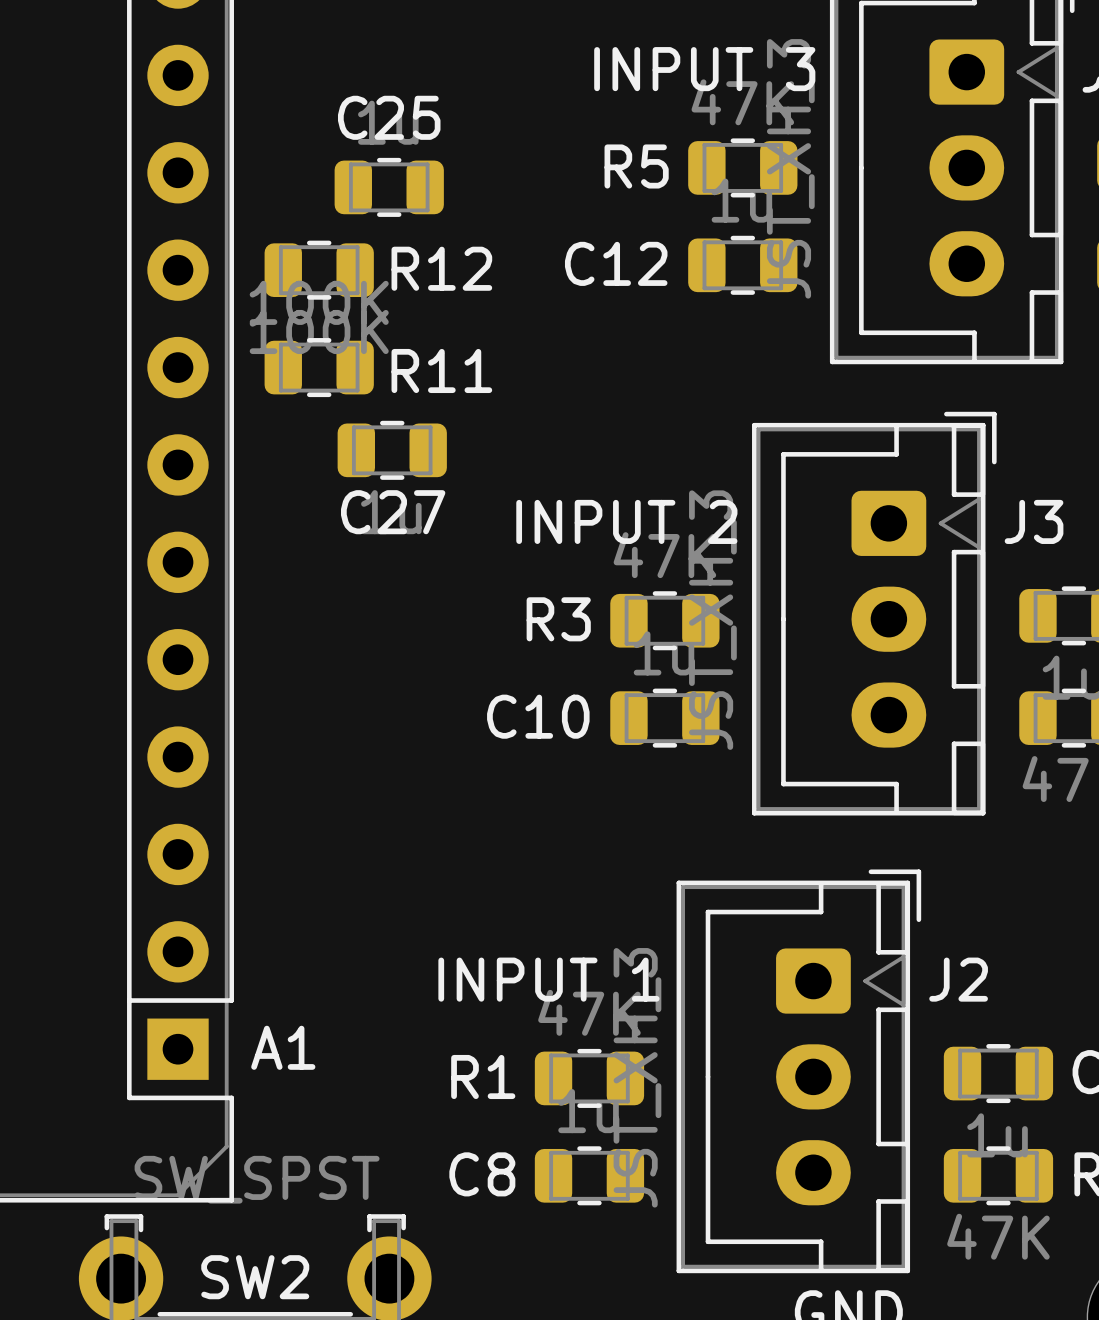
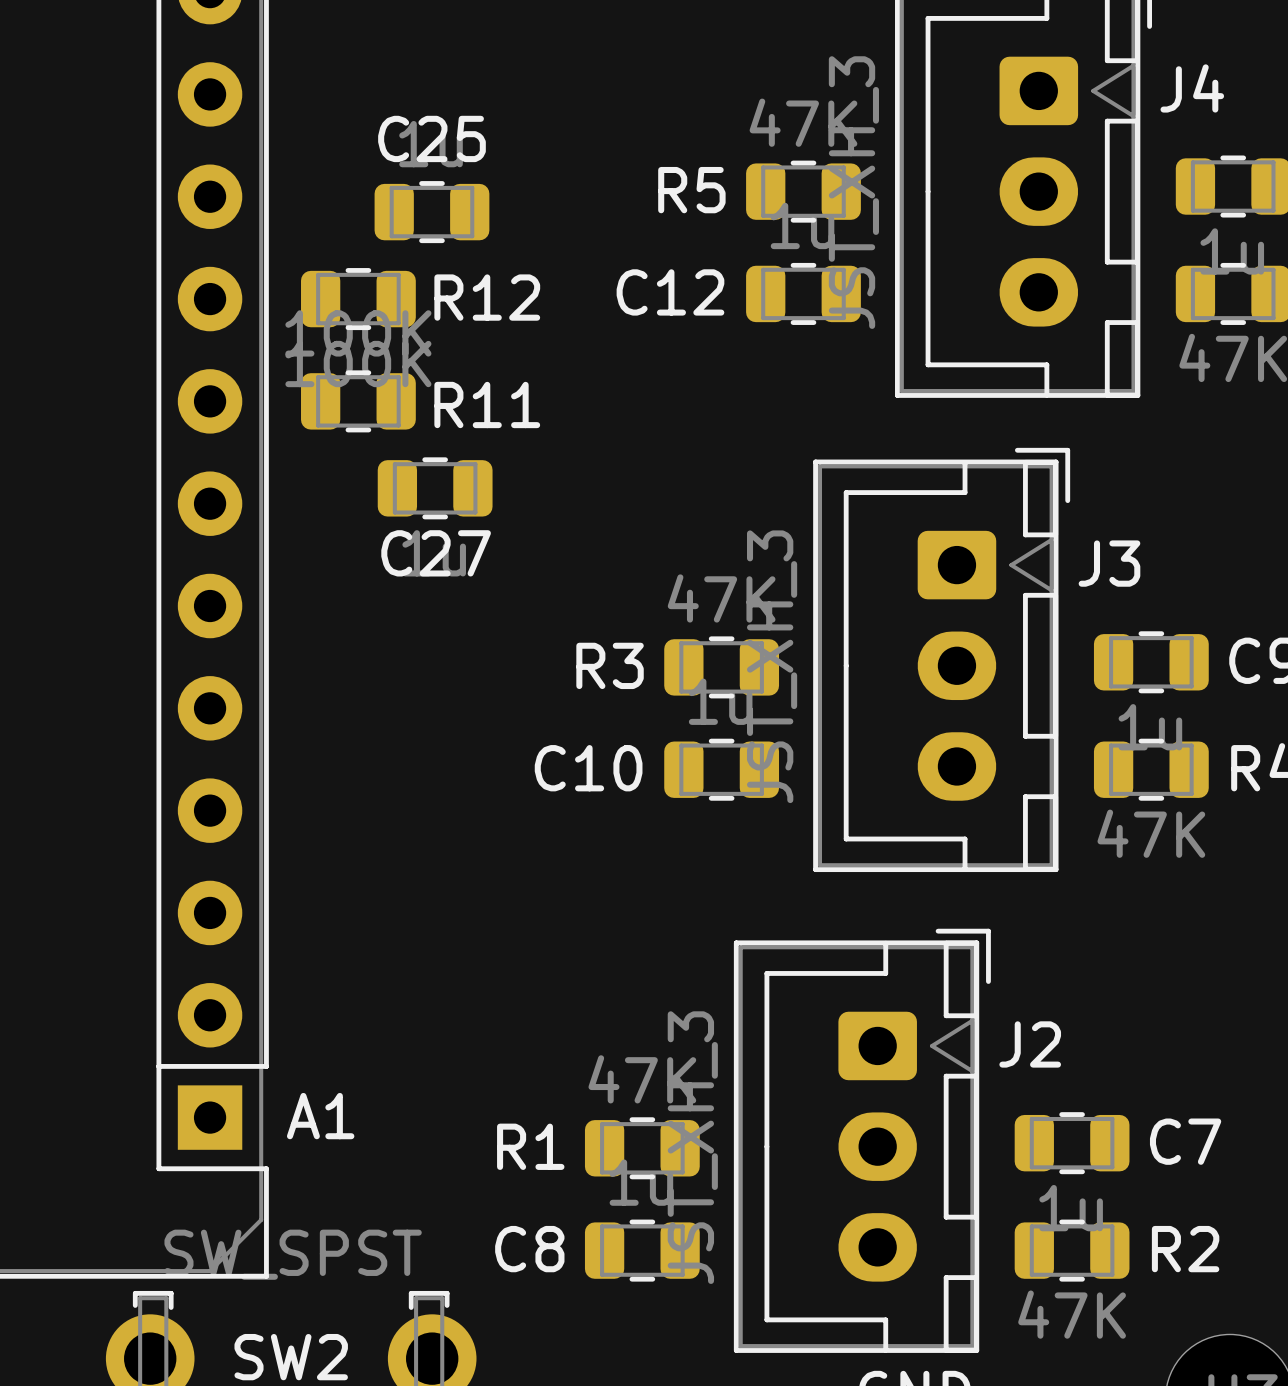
text: INPUT 3 (704, 69) -> none
text: INPUT 2 (626, 521) -> none
text: INPUT 1 (548, 979) -> none

